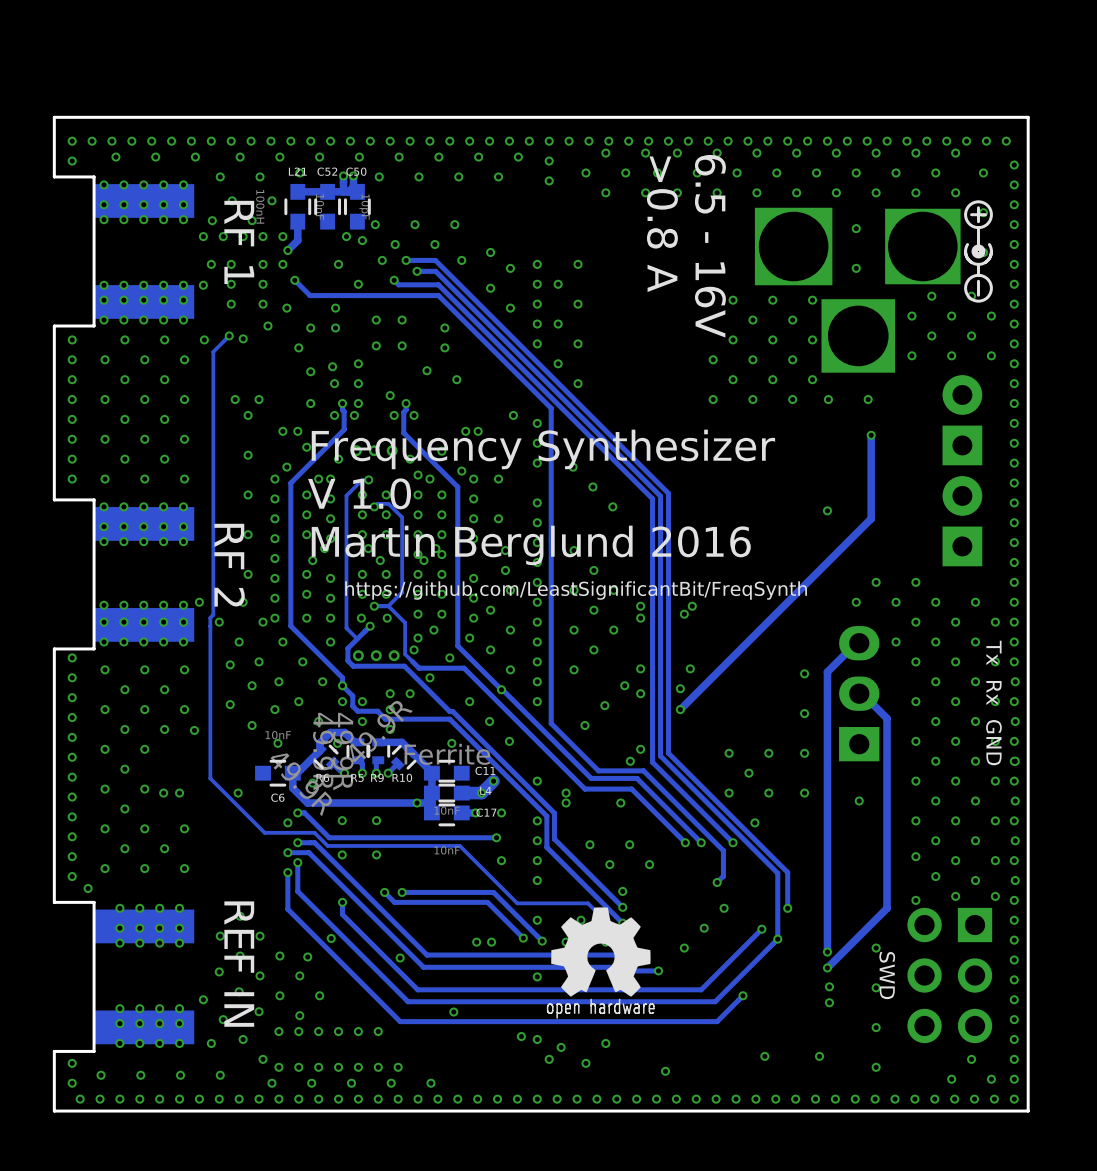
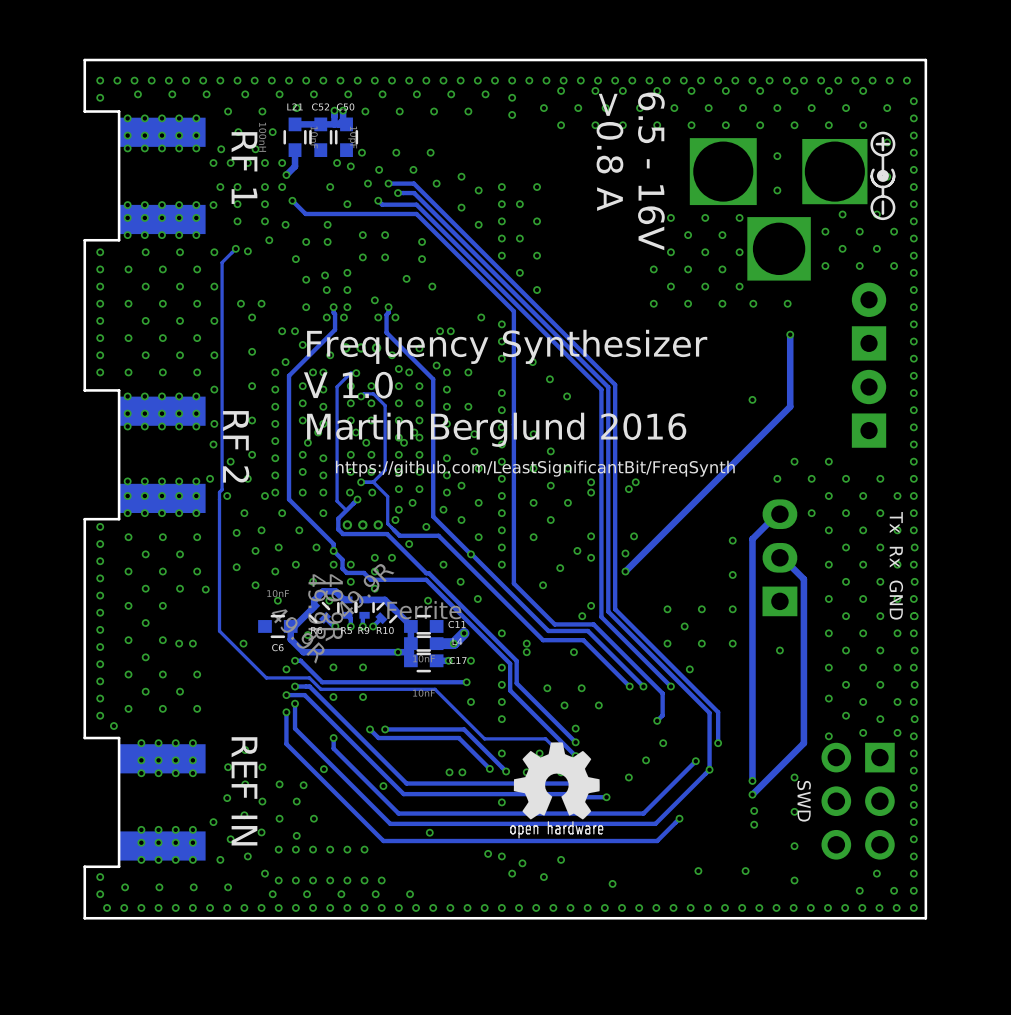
part: none -> (214, 286)
part: none -> (214, 320)
part: none -> (214, 355)
part: none -> (214, 389)
part: none -> (214, 423)
part: none -> (213, 444)
part: none -> (230, 461)

